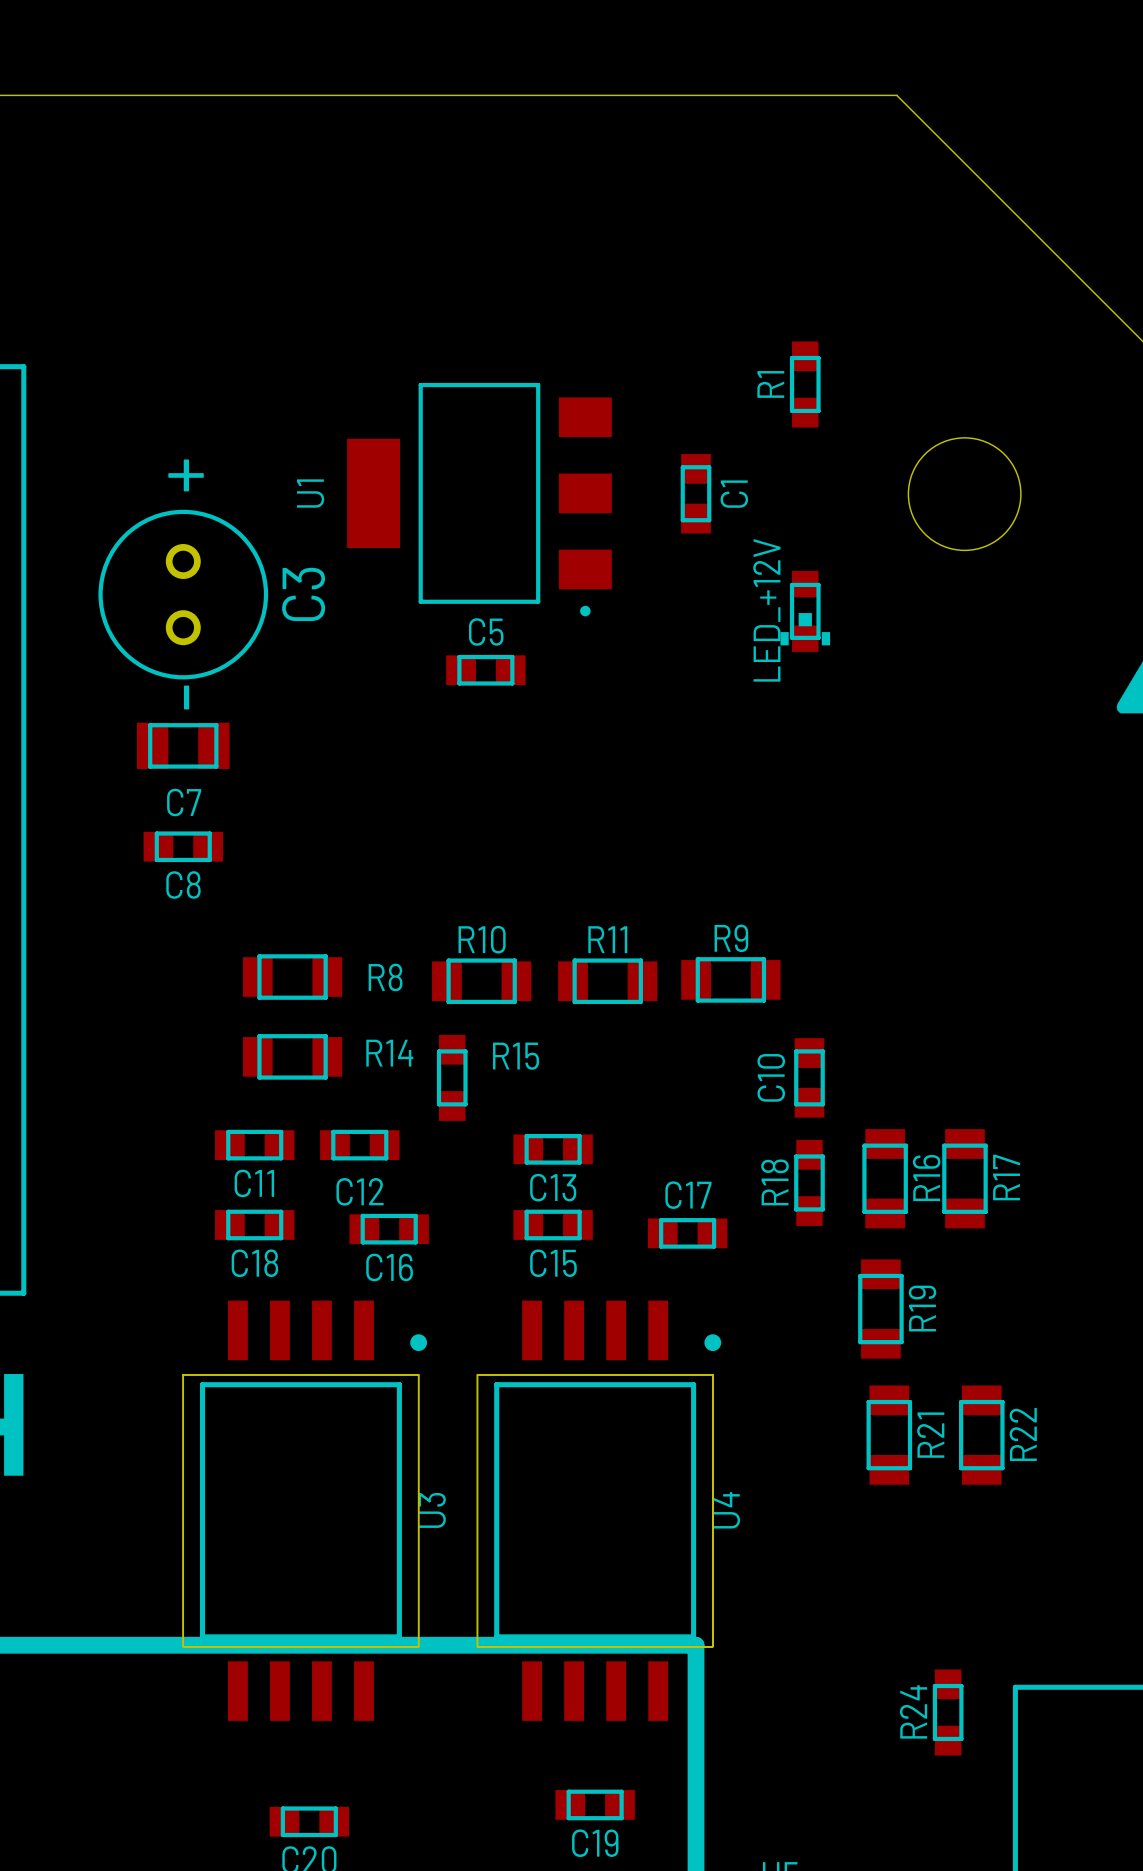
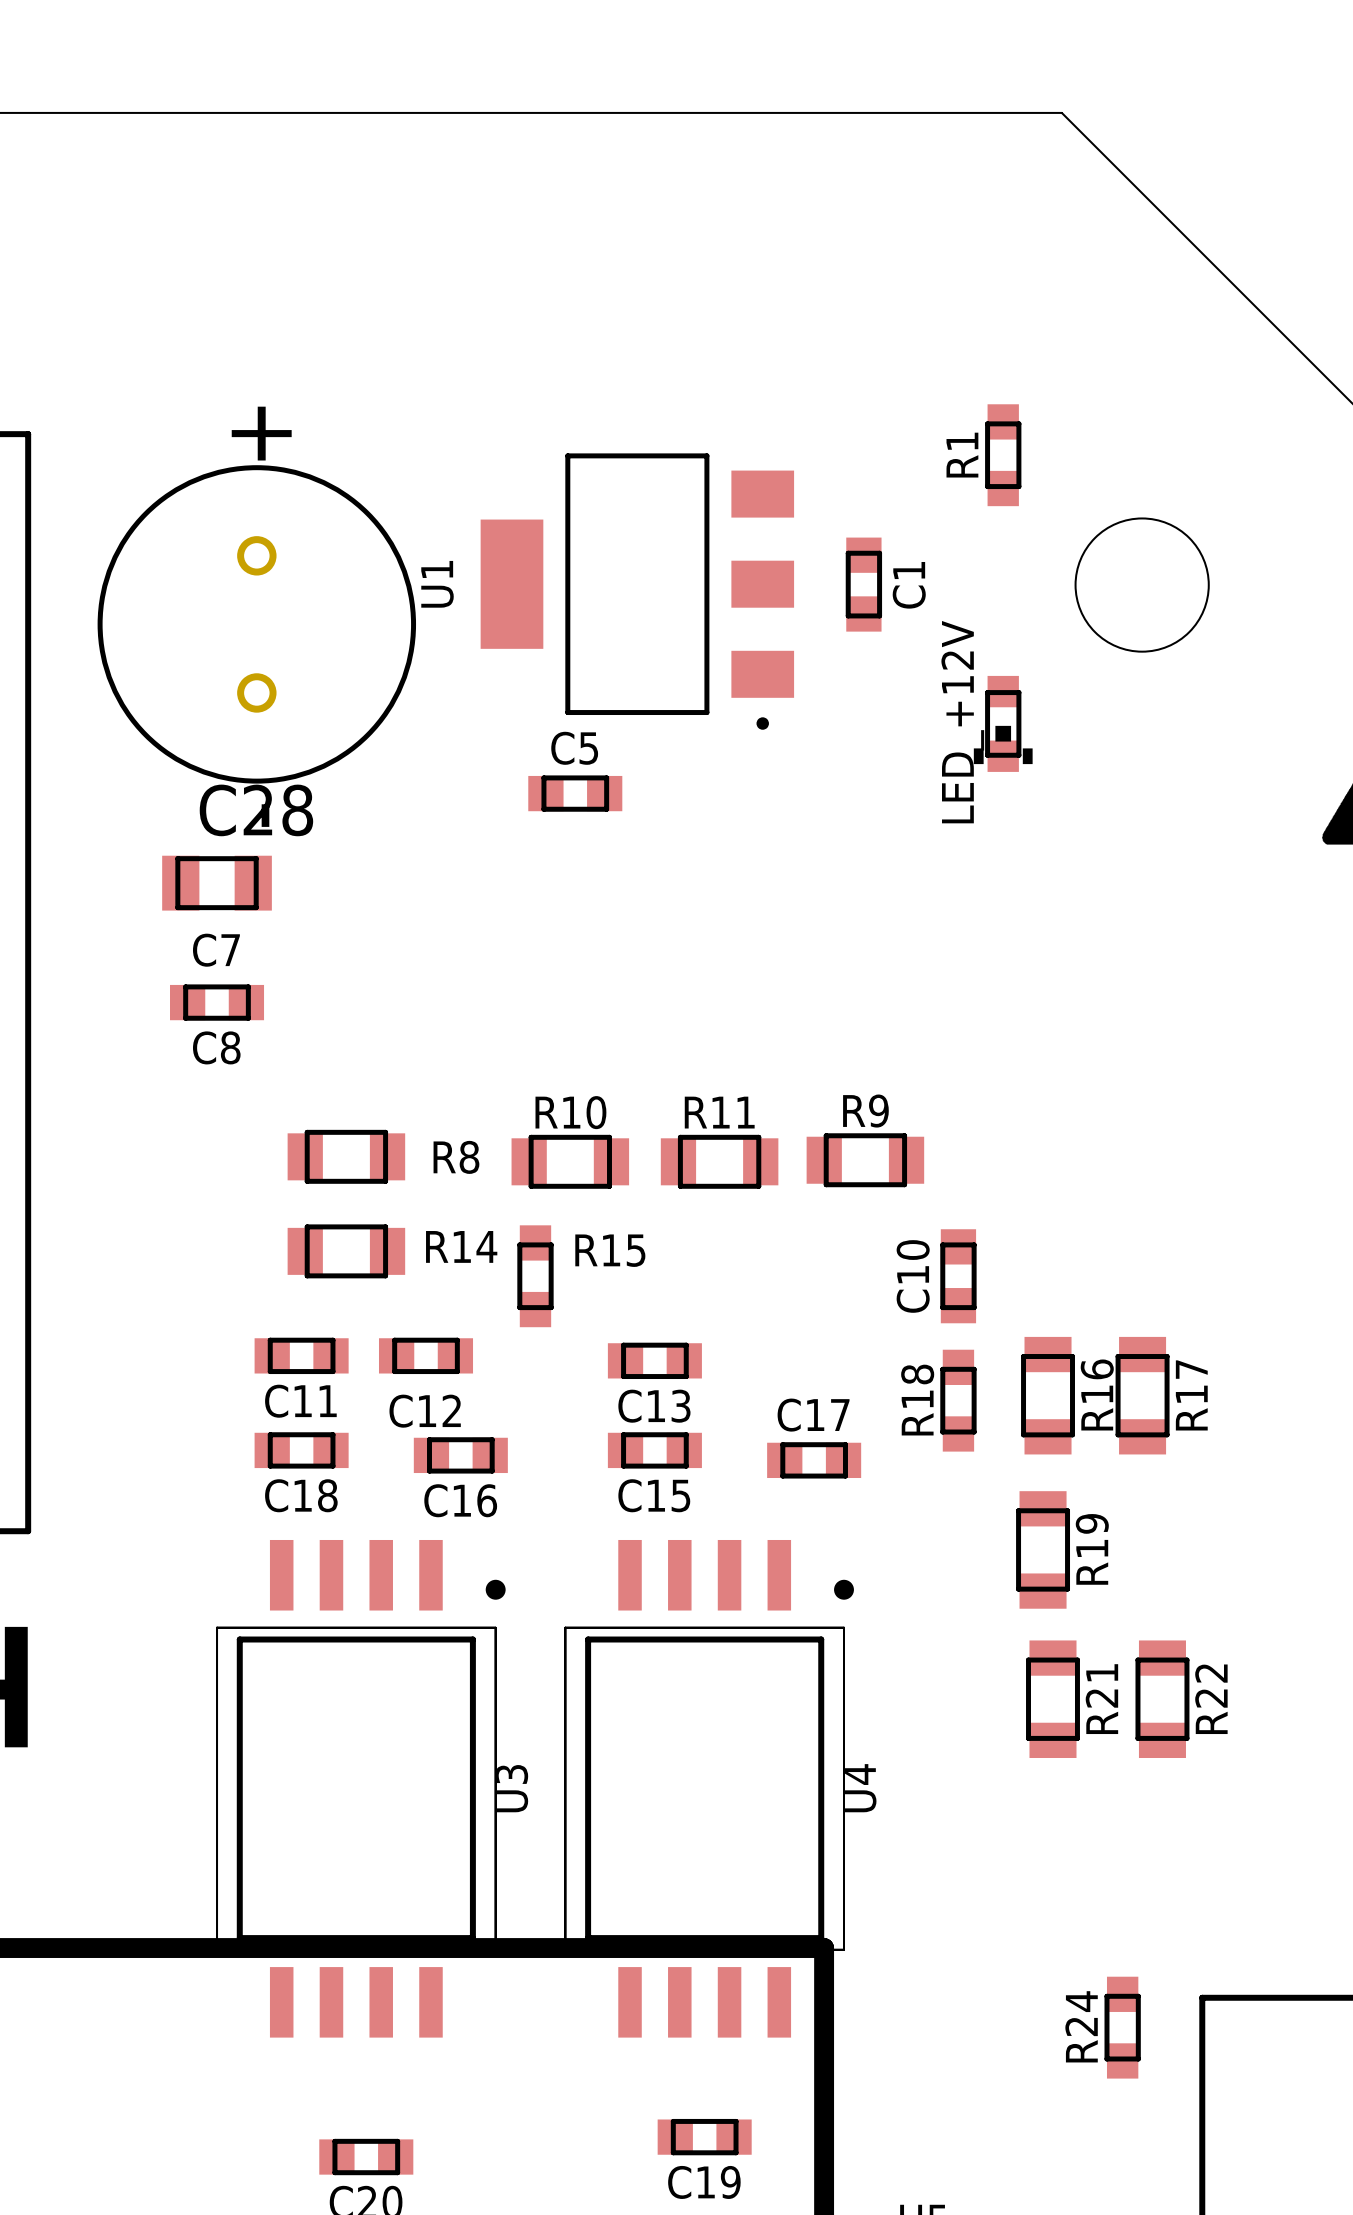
R1 position: (805, 384) -> (1003, 455)
C1 position: (696, 493) -> (863, 584)
U1 position: (479, 499) -> (637, 591)
C28: none -> (256, 624)
C3: (183, 594) -> none
LED_+12V position: (805, 611) -> (1003, 723)

